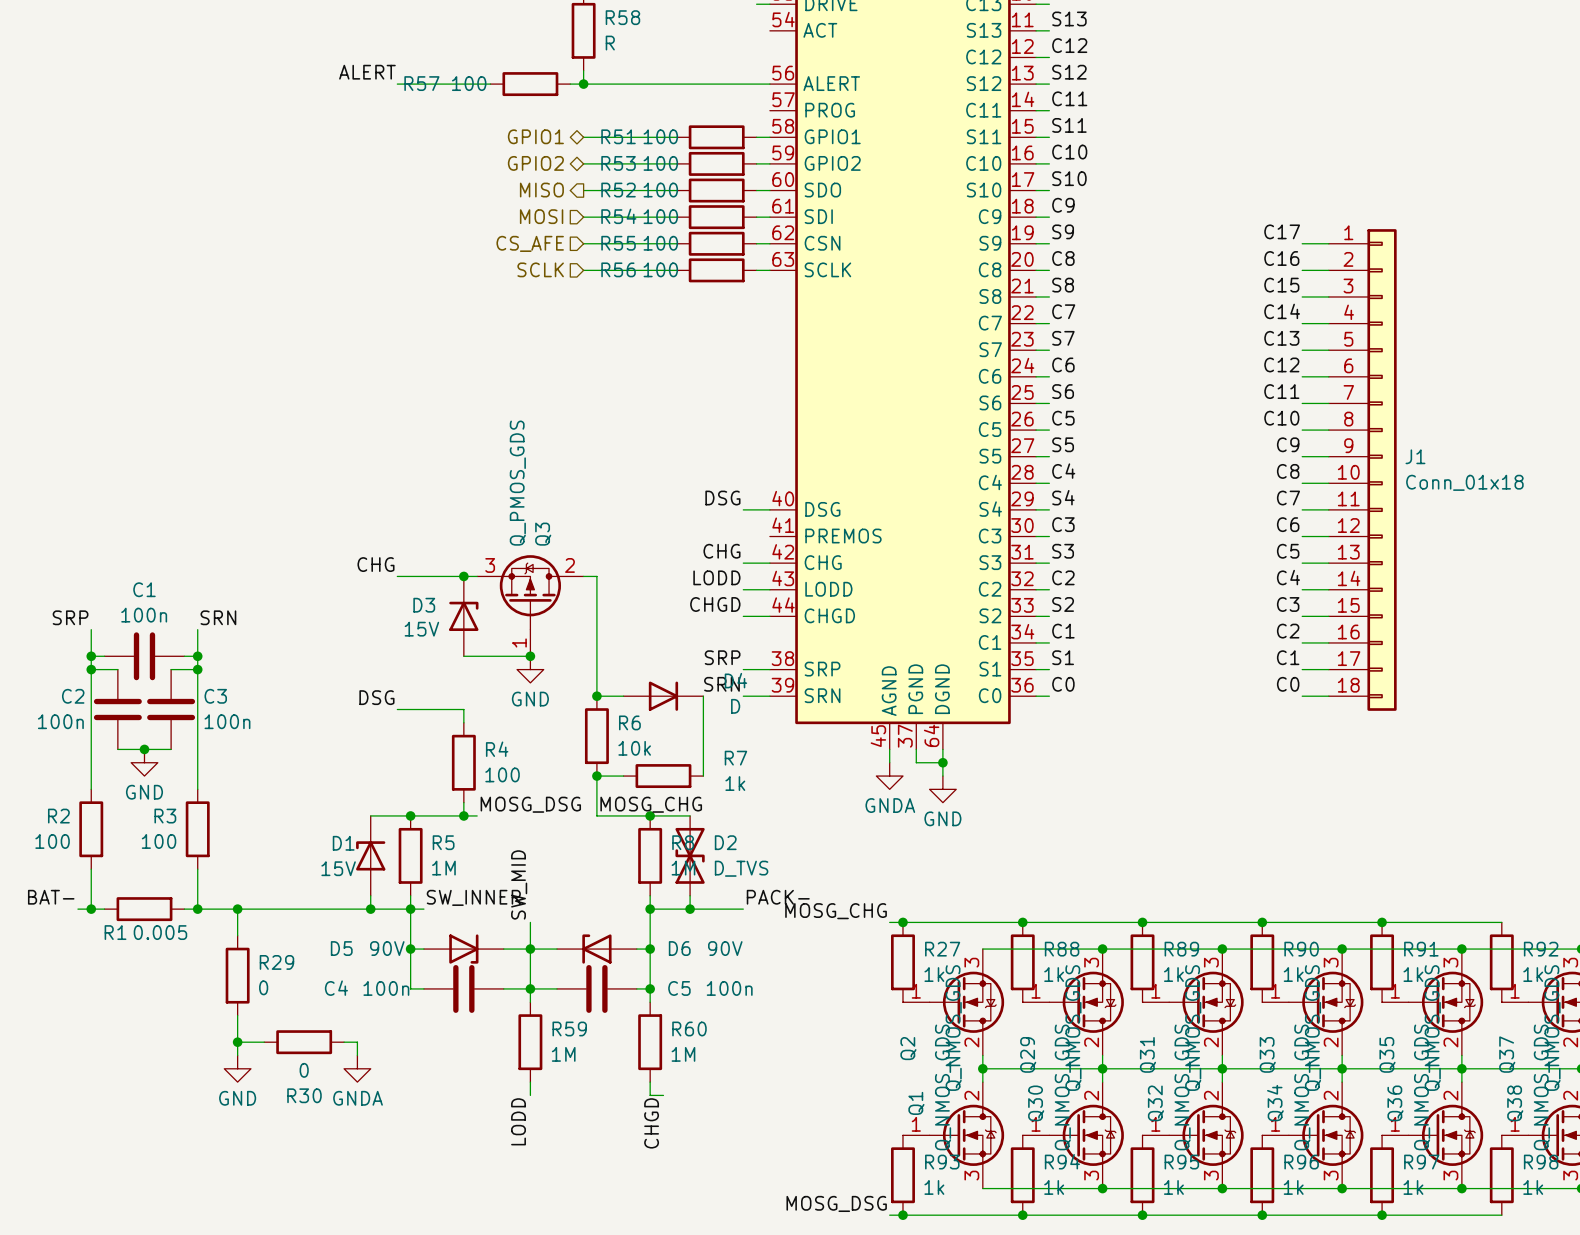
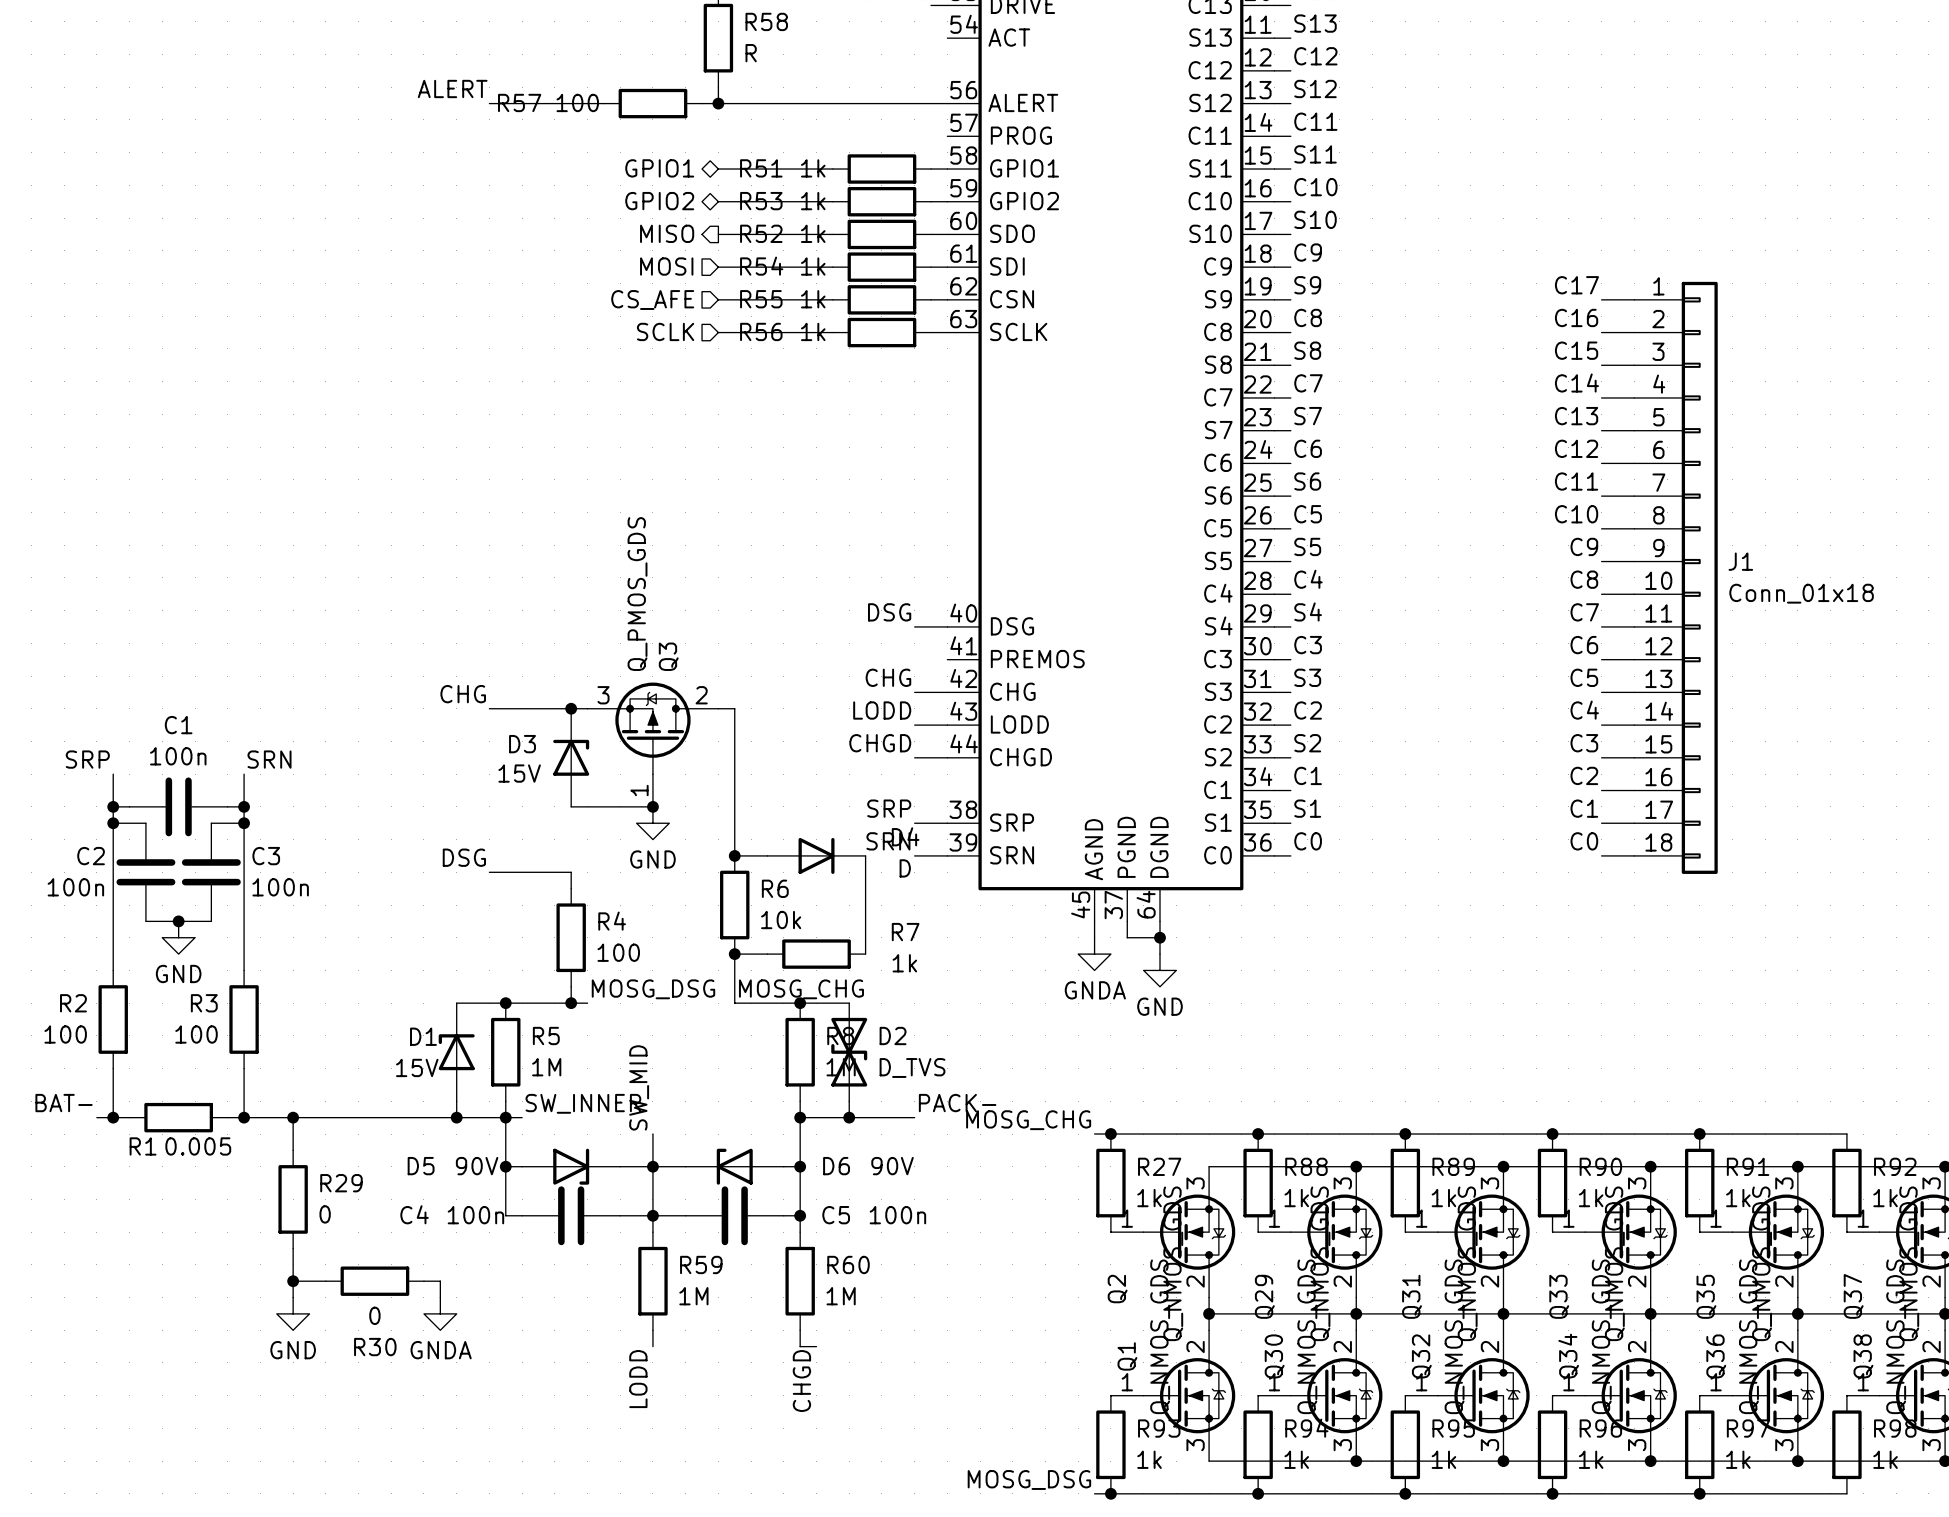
R51 value: 100 (660, 136) -> 1k (813, 168)
R53 value: 100 (660, 163) -> 1k (813, 201)
R52 value: 100 (660, 190) -> 1k (813, 233)
R54 value: 100 (660, 216) -> 1k (813, 266)
R55 value: 100 (660, 243) -> 1k (813, 299)
R56 value: 100 (660, 269) -> 1k (813, 331)

